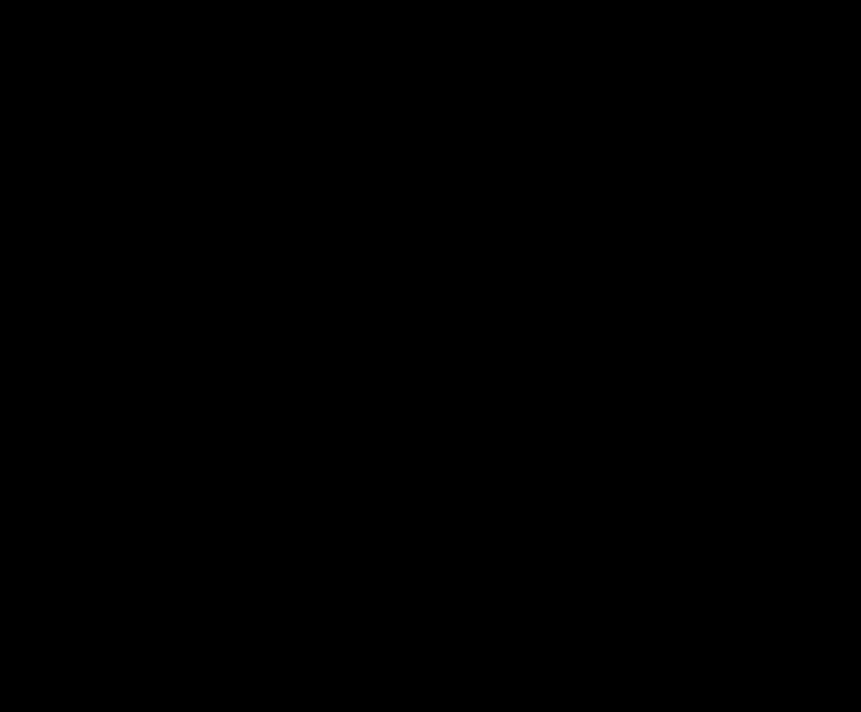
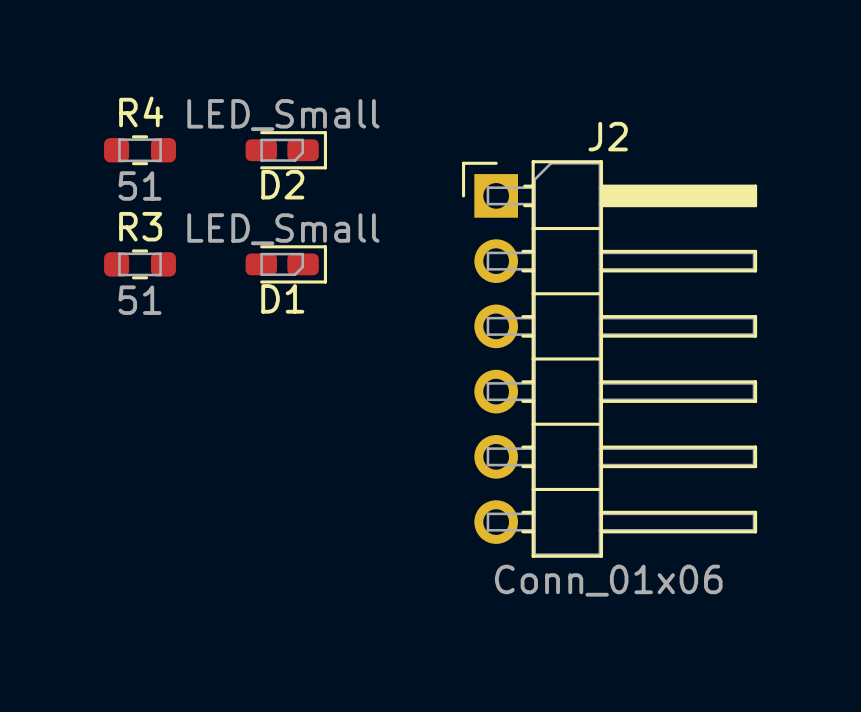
R4: none -> 51 (140, 150)
D2: none -> LED_Small (286, 150)
R3: none -> 51 (140, 264)
D1: none -> LED_Small (286, 264)
J2: none -> Conn_01x06 (609, 358)

